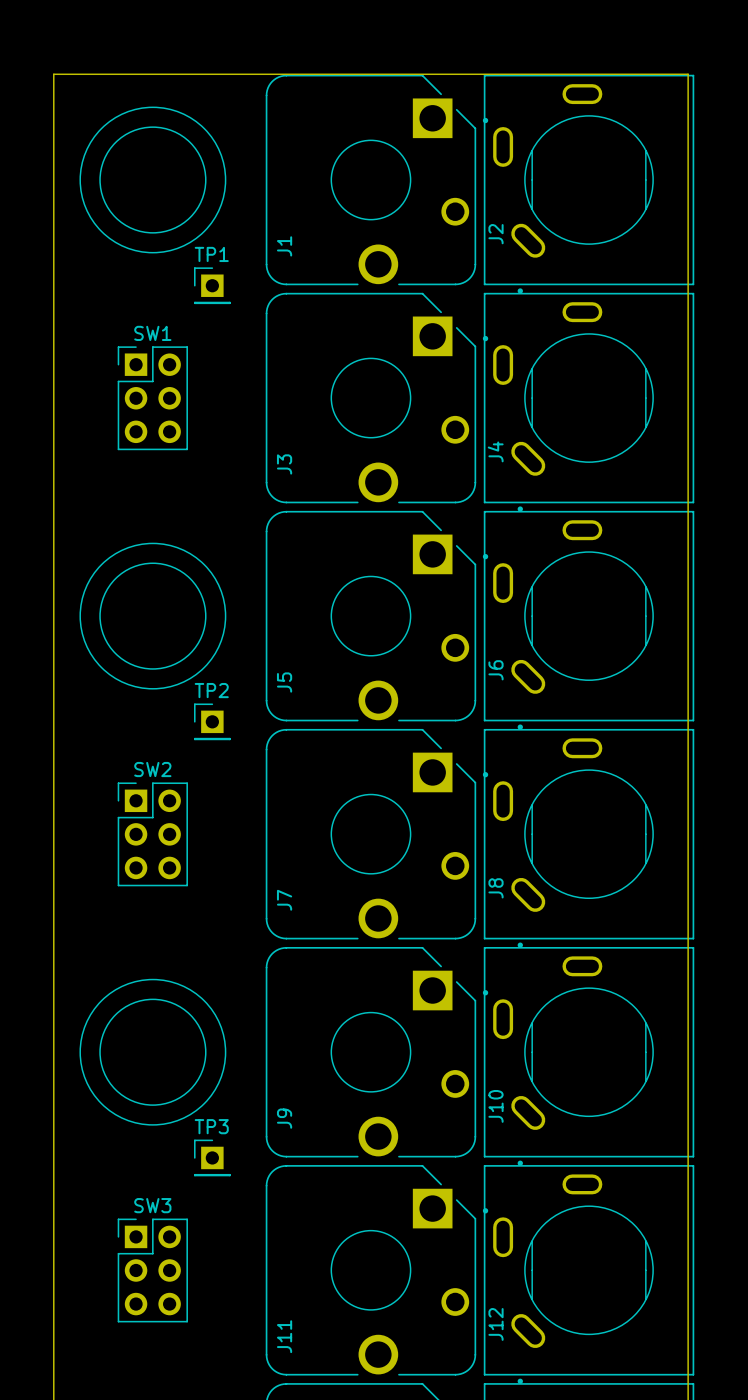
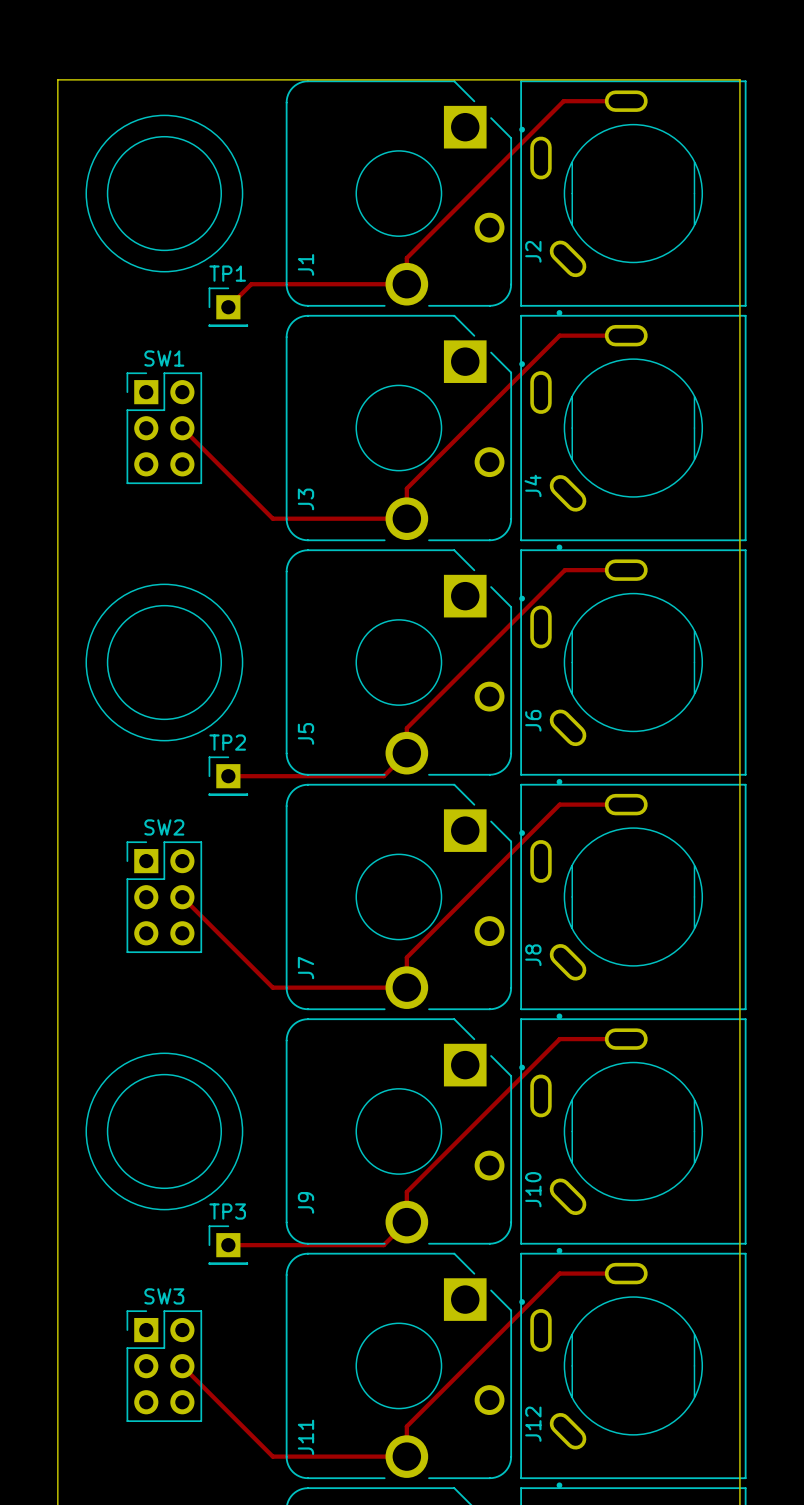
track: none -> (626, 101) (563, 101) (406, 258) (406, 284) (251, 284) (228, 307)
track: none -> (626, 335) (559, 335) (406, 488) (406, 518) (272, 518) (182, 428)
track: none -> (626, 570) (564, 570) (406, 728) (406, 753) (383, 776) (228, 776)
track: none -> (626, 804) (559, 804) (406, 957) (406, 987) (272, 987) (182, 897)
track: none -> (626, 1039) (559, 1039) (406, 1191) (406, 1222) (383, 1245) (228, 1245)
track: none -> (626, 1273) (559, 1273) (406, 1426) (406, 1456) (272, 1456) (182, 1366)

